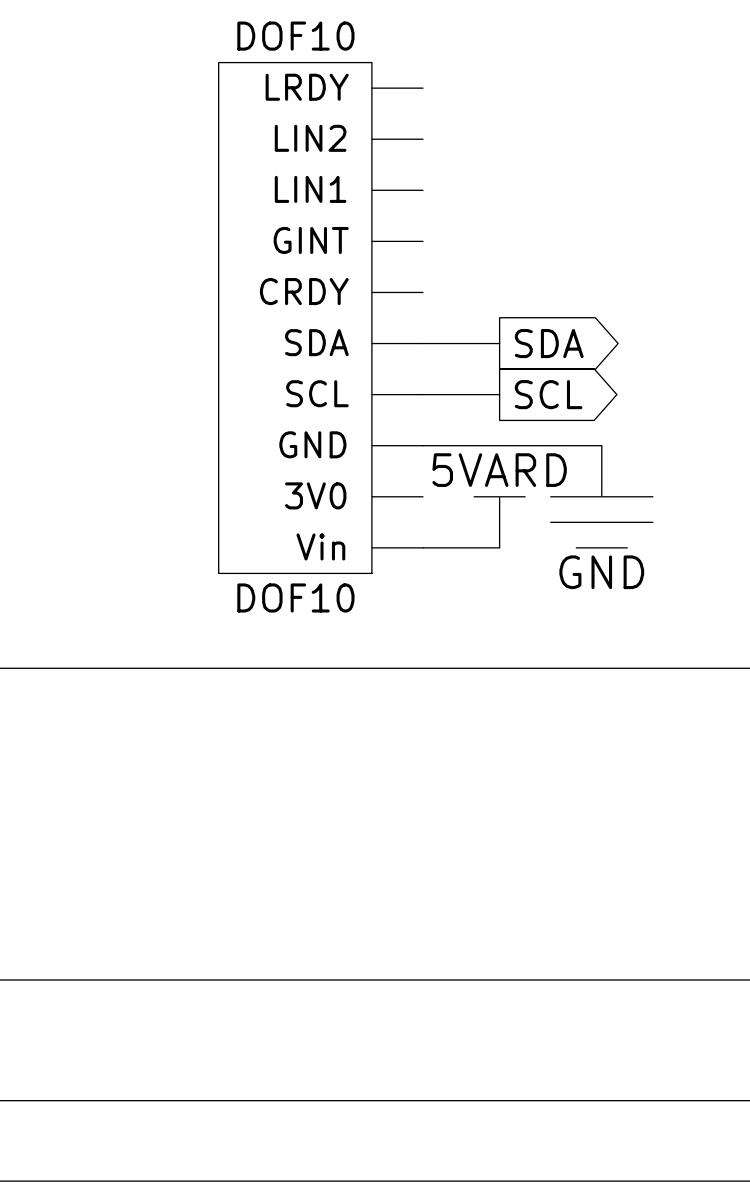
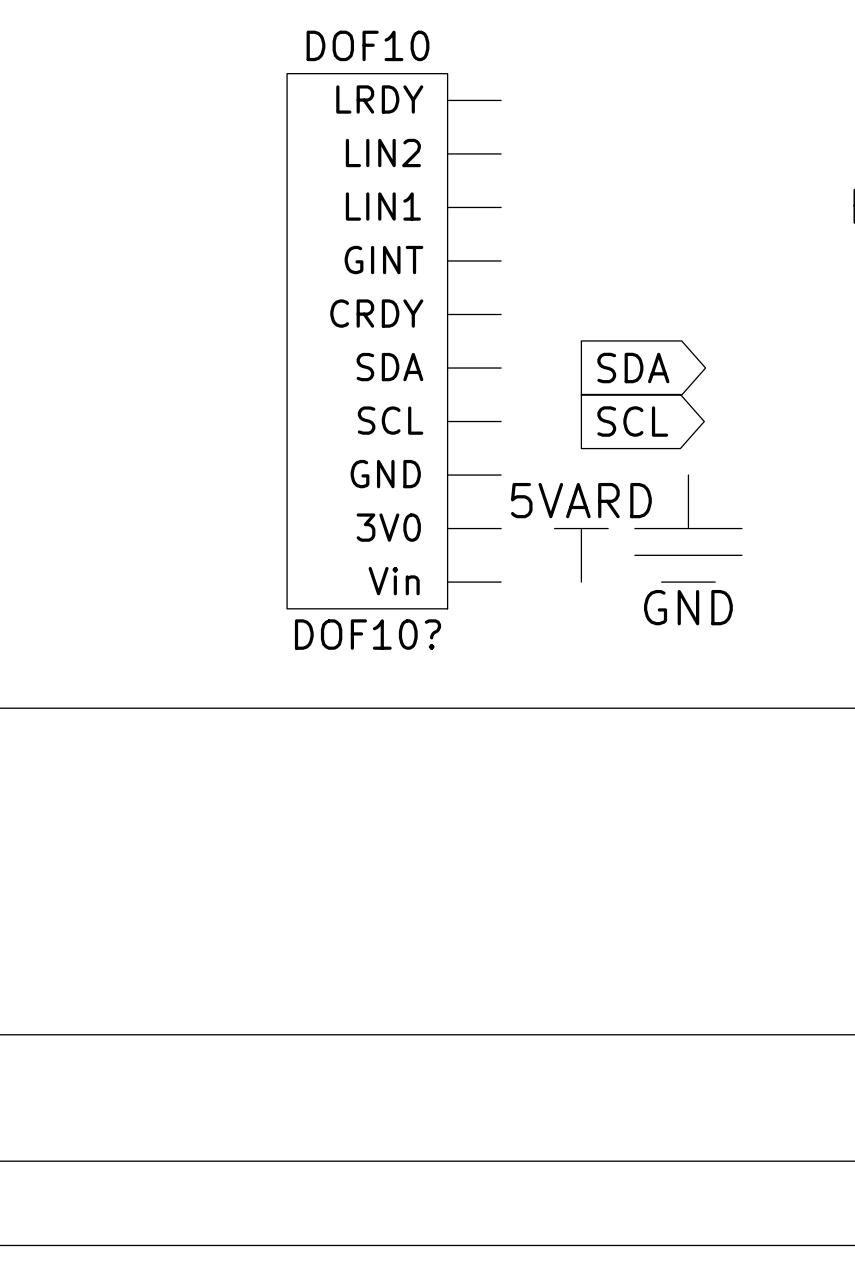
wire: (422, 343) (499, 343) -> none
wire: (422, 394) (499, 394) -> none
wire: (422, 445) (601, 445) -> none
wire: (422, 547) (499, 547) -> none
DOF10 name: DOF10 (295, 597) -> DOF10? (367, 634)

